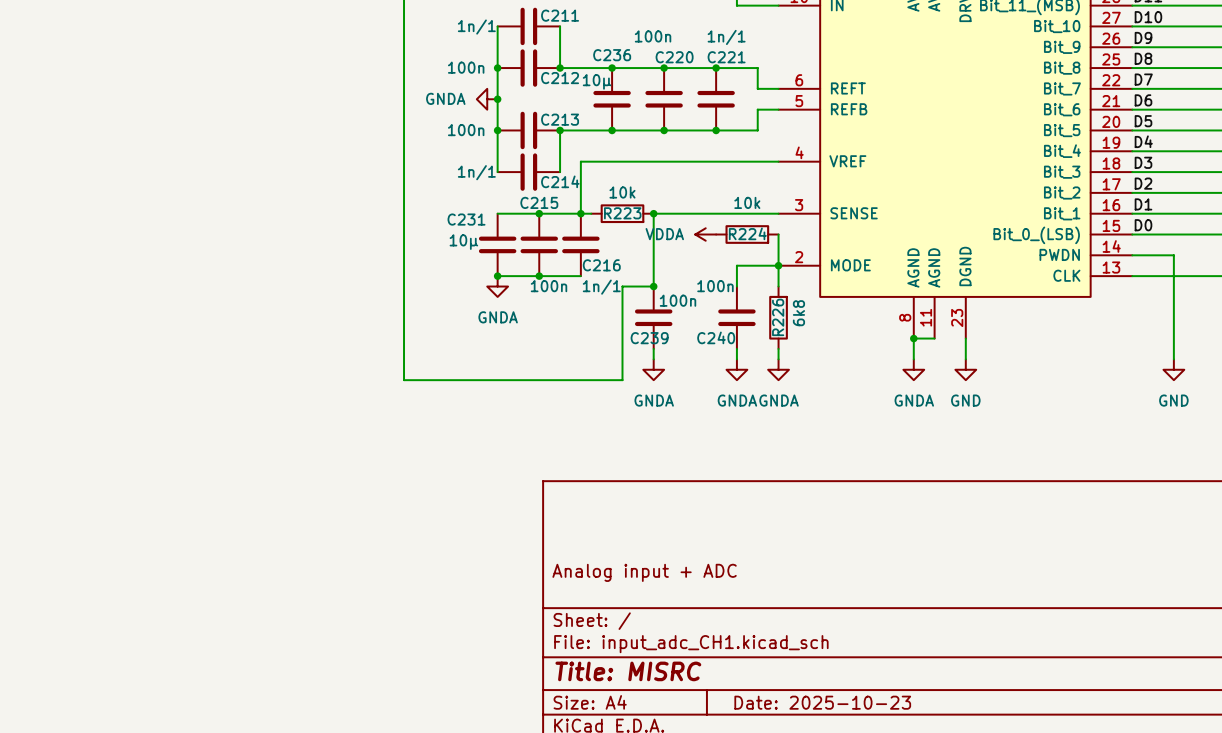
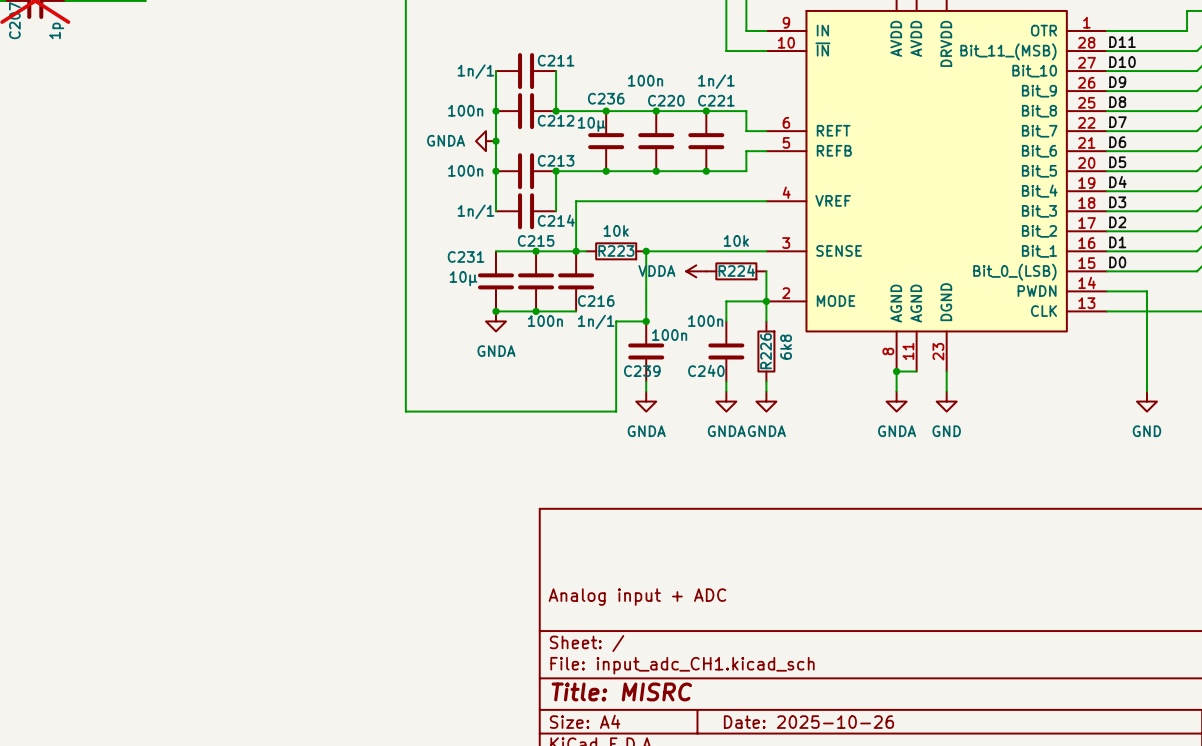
title block: Date: 2025-10-23 (822, 702) -> Date: 2025-10-26 (808, 722)

